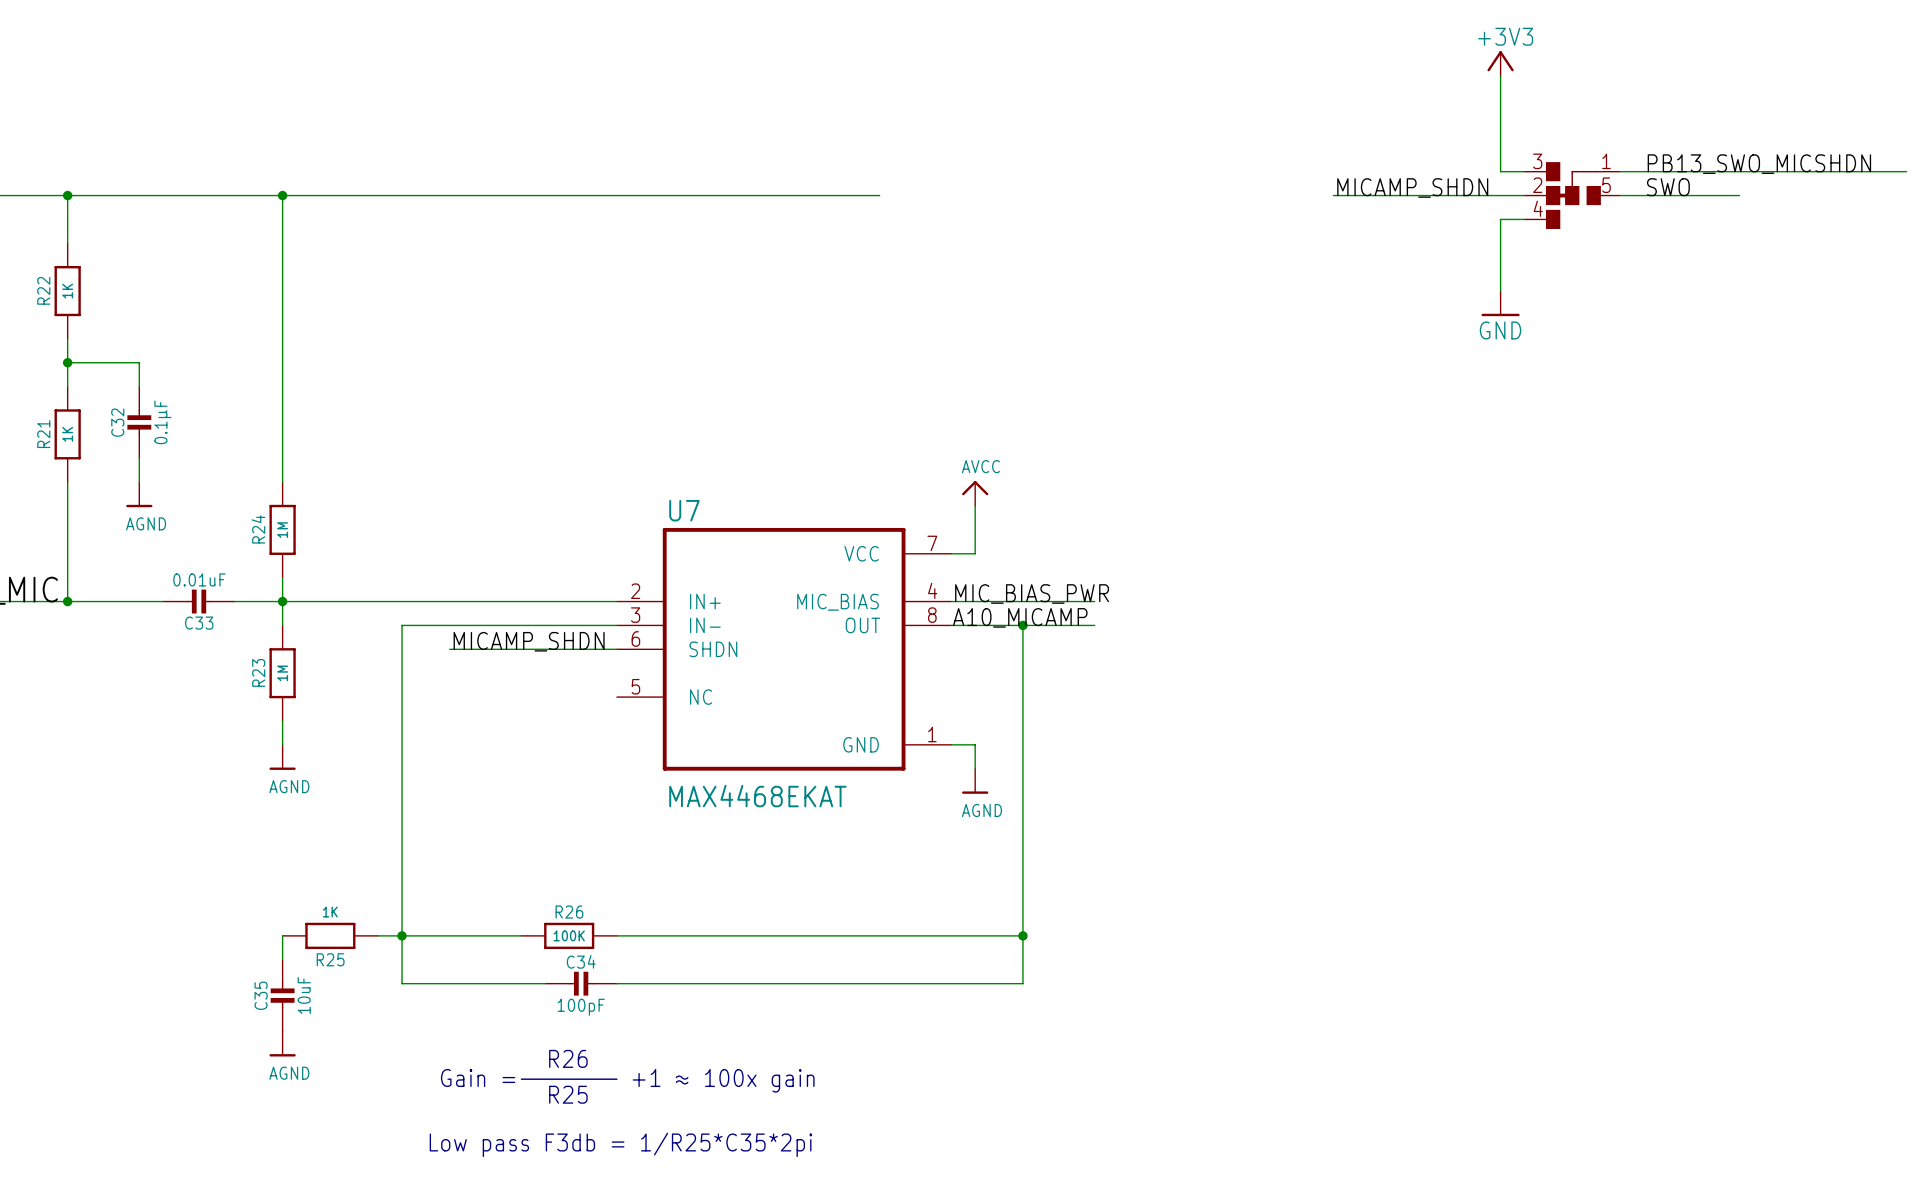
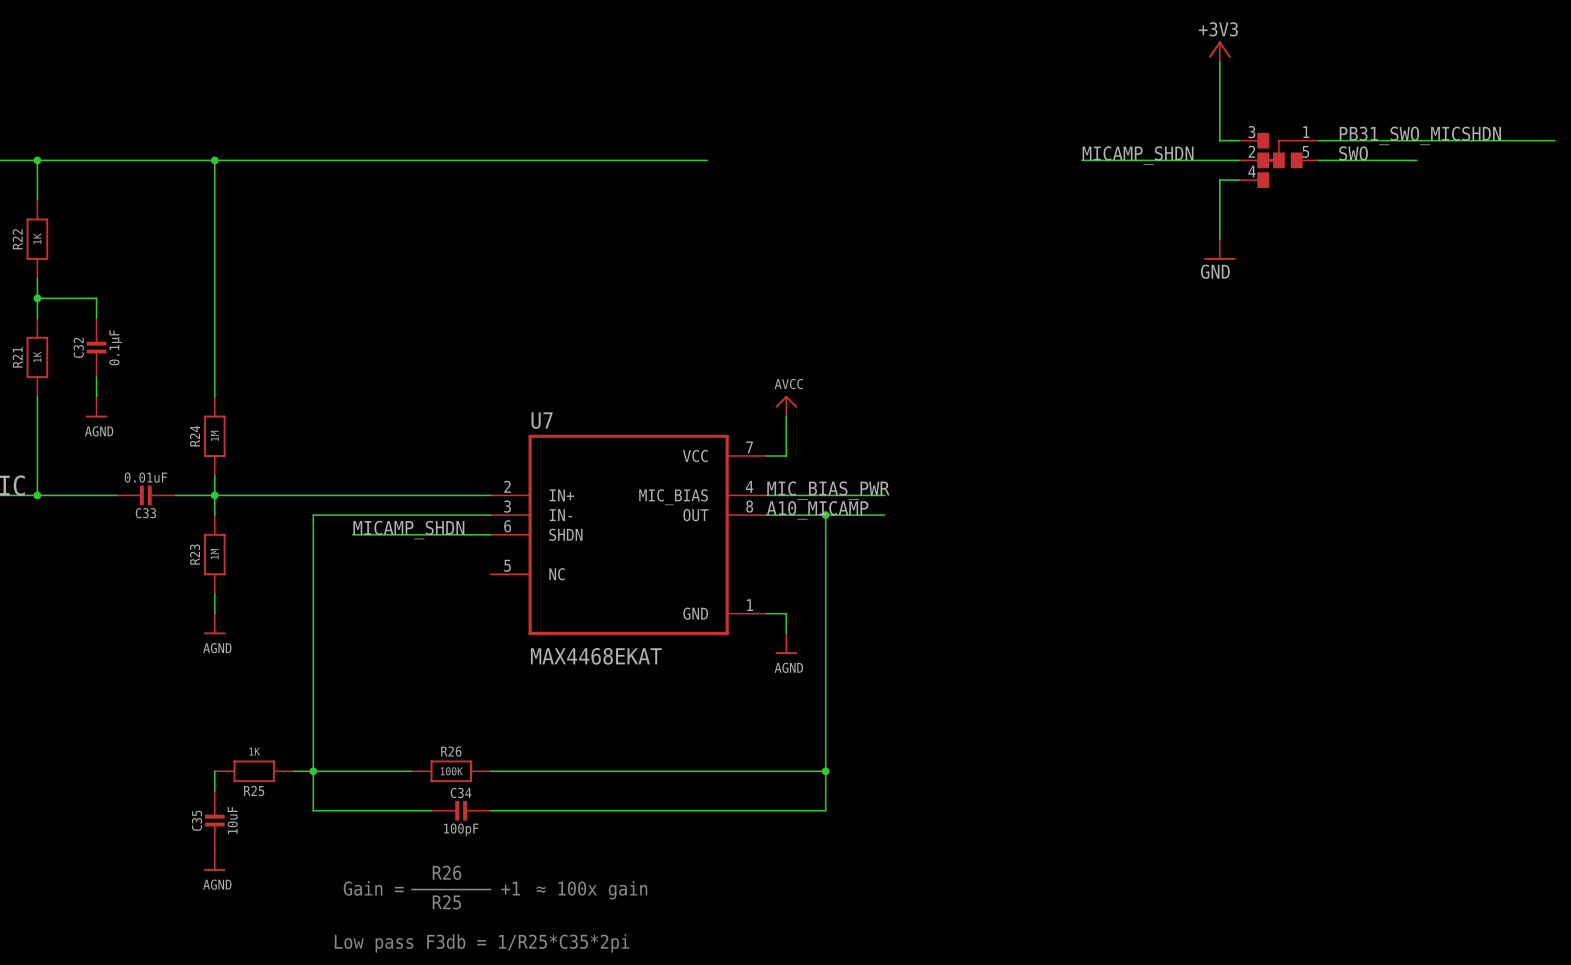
label: PB13_SWO_MICSHDN (1759, 164) -> PB31_SWO_MICSHDN (1420, 135)

